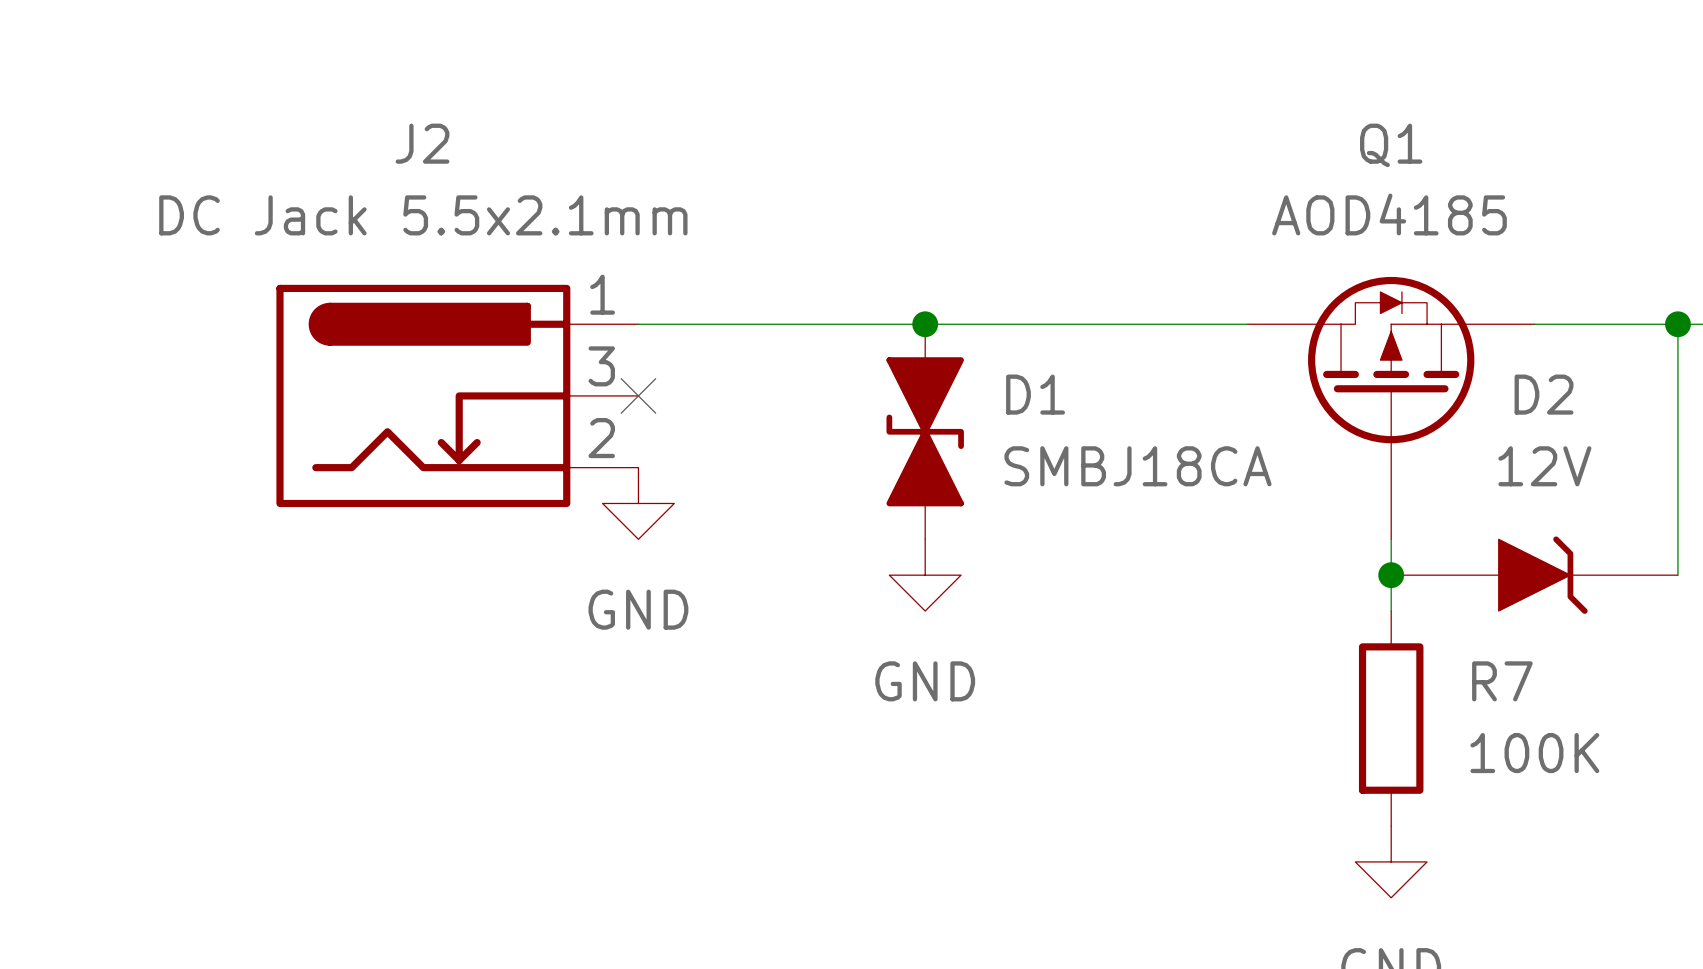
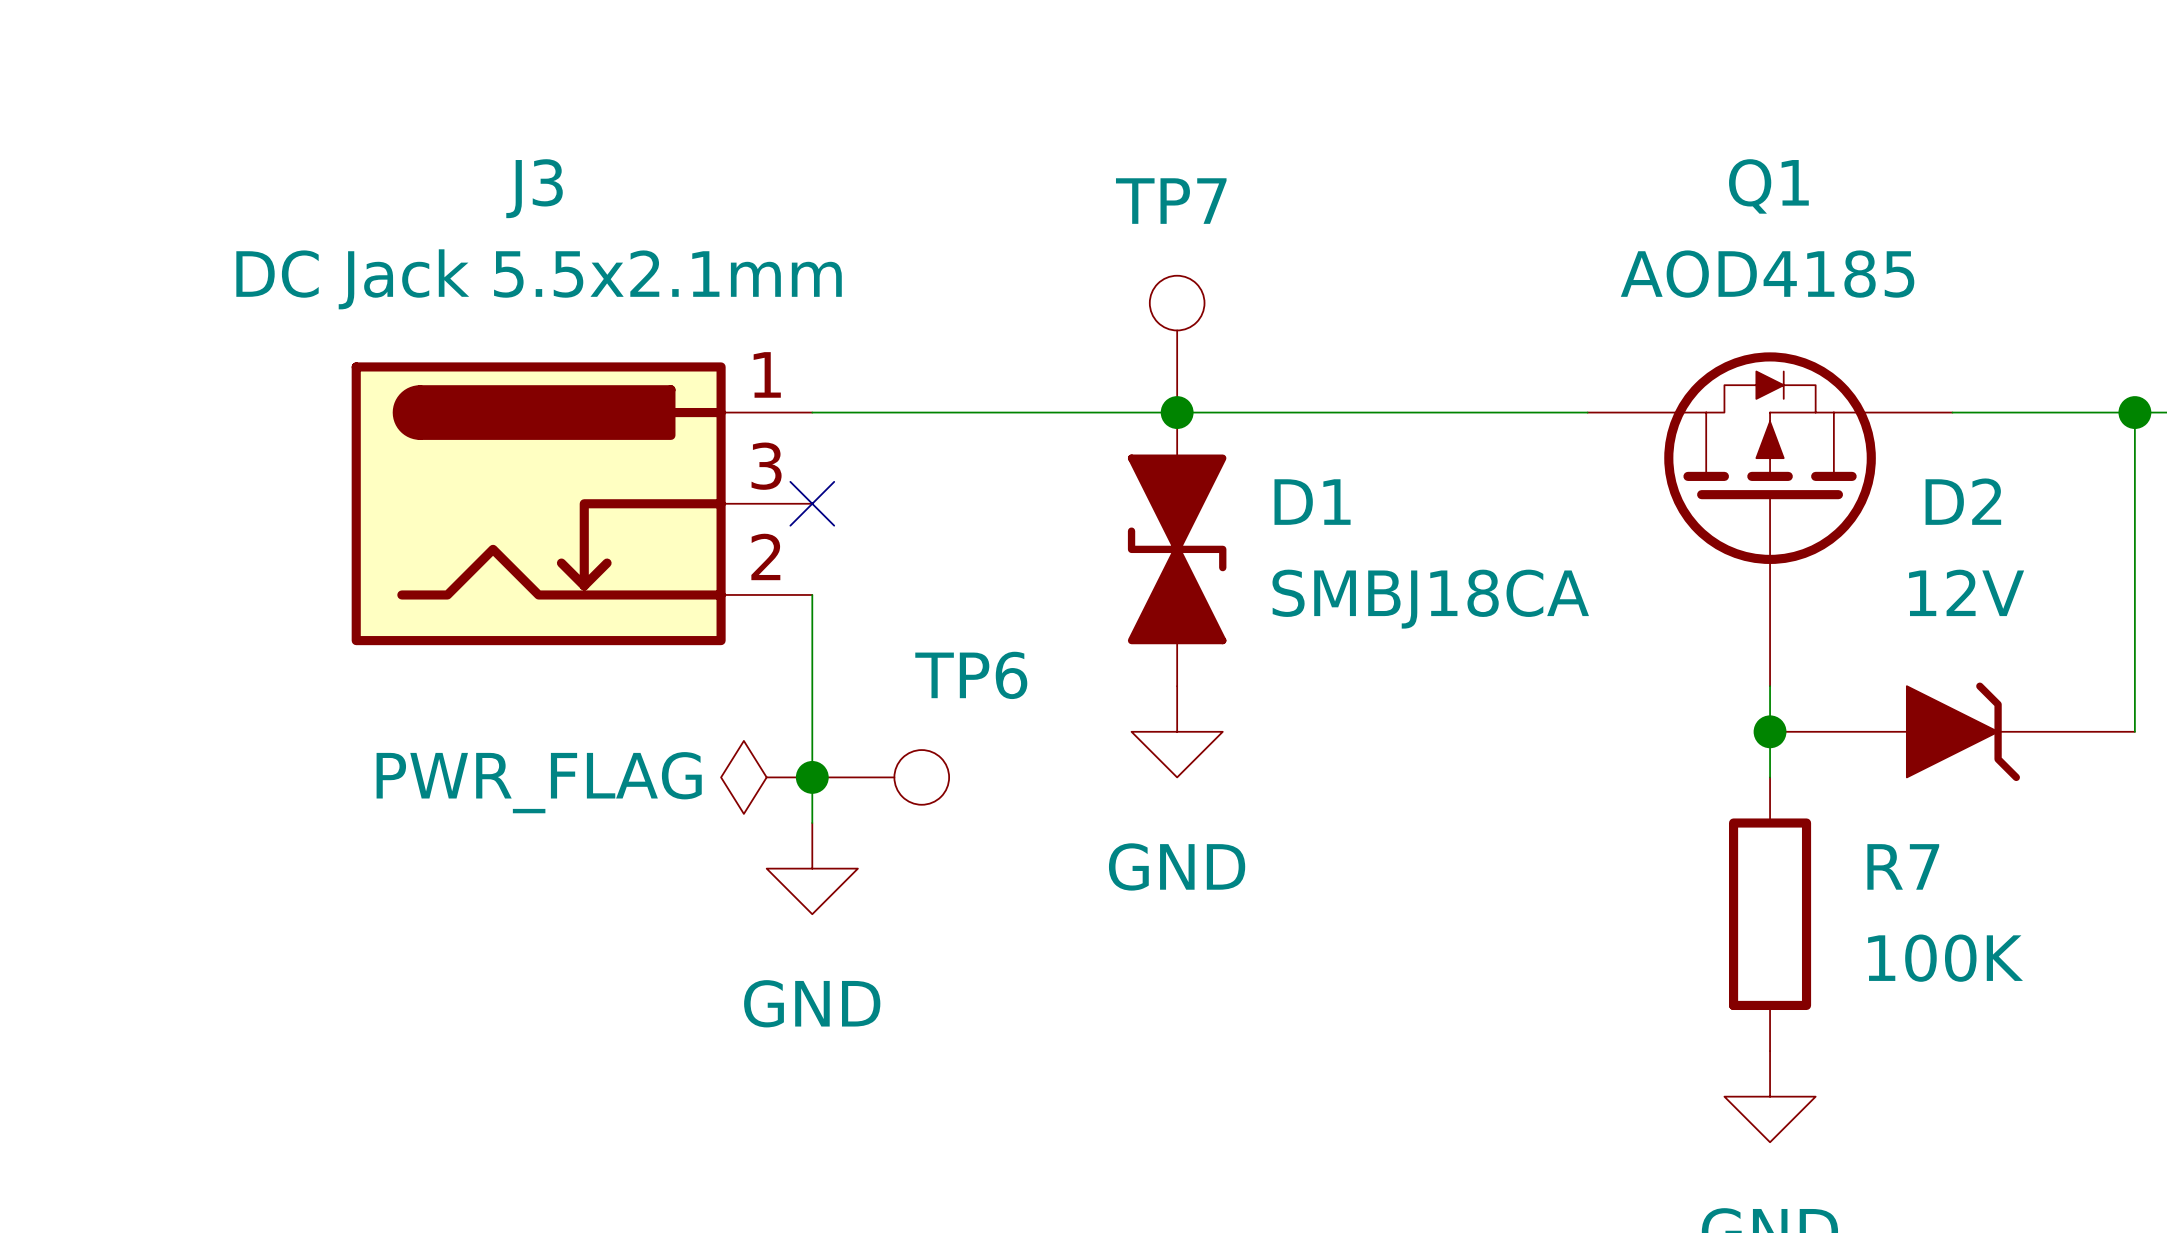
J2 name: J2 (422, 143) -> J3 (534, 188)
TP7: none -> (1177, 344)
wire: none -> (812, 594) (812, 823)
power symbol position: GND (638, 503) -> GND (812, 868)
power symbol: none -> PWR_FLAG (766, 777)
junction: none -> (812, 777)
TP6: none -> (880, 777)

